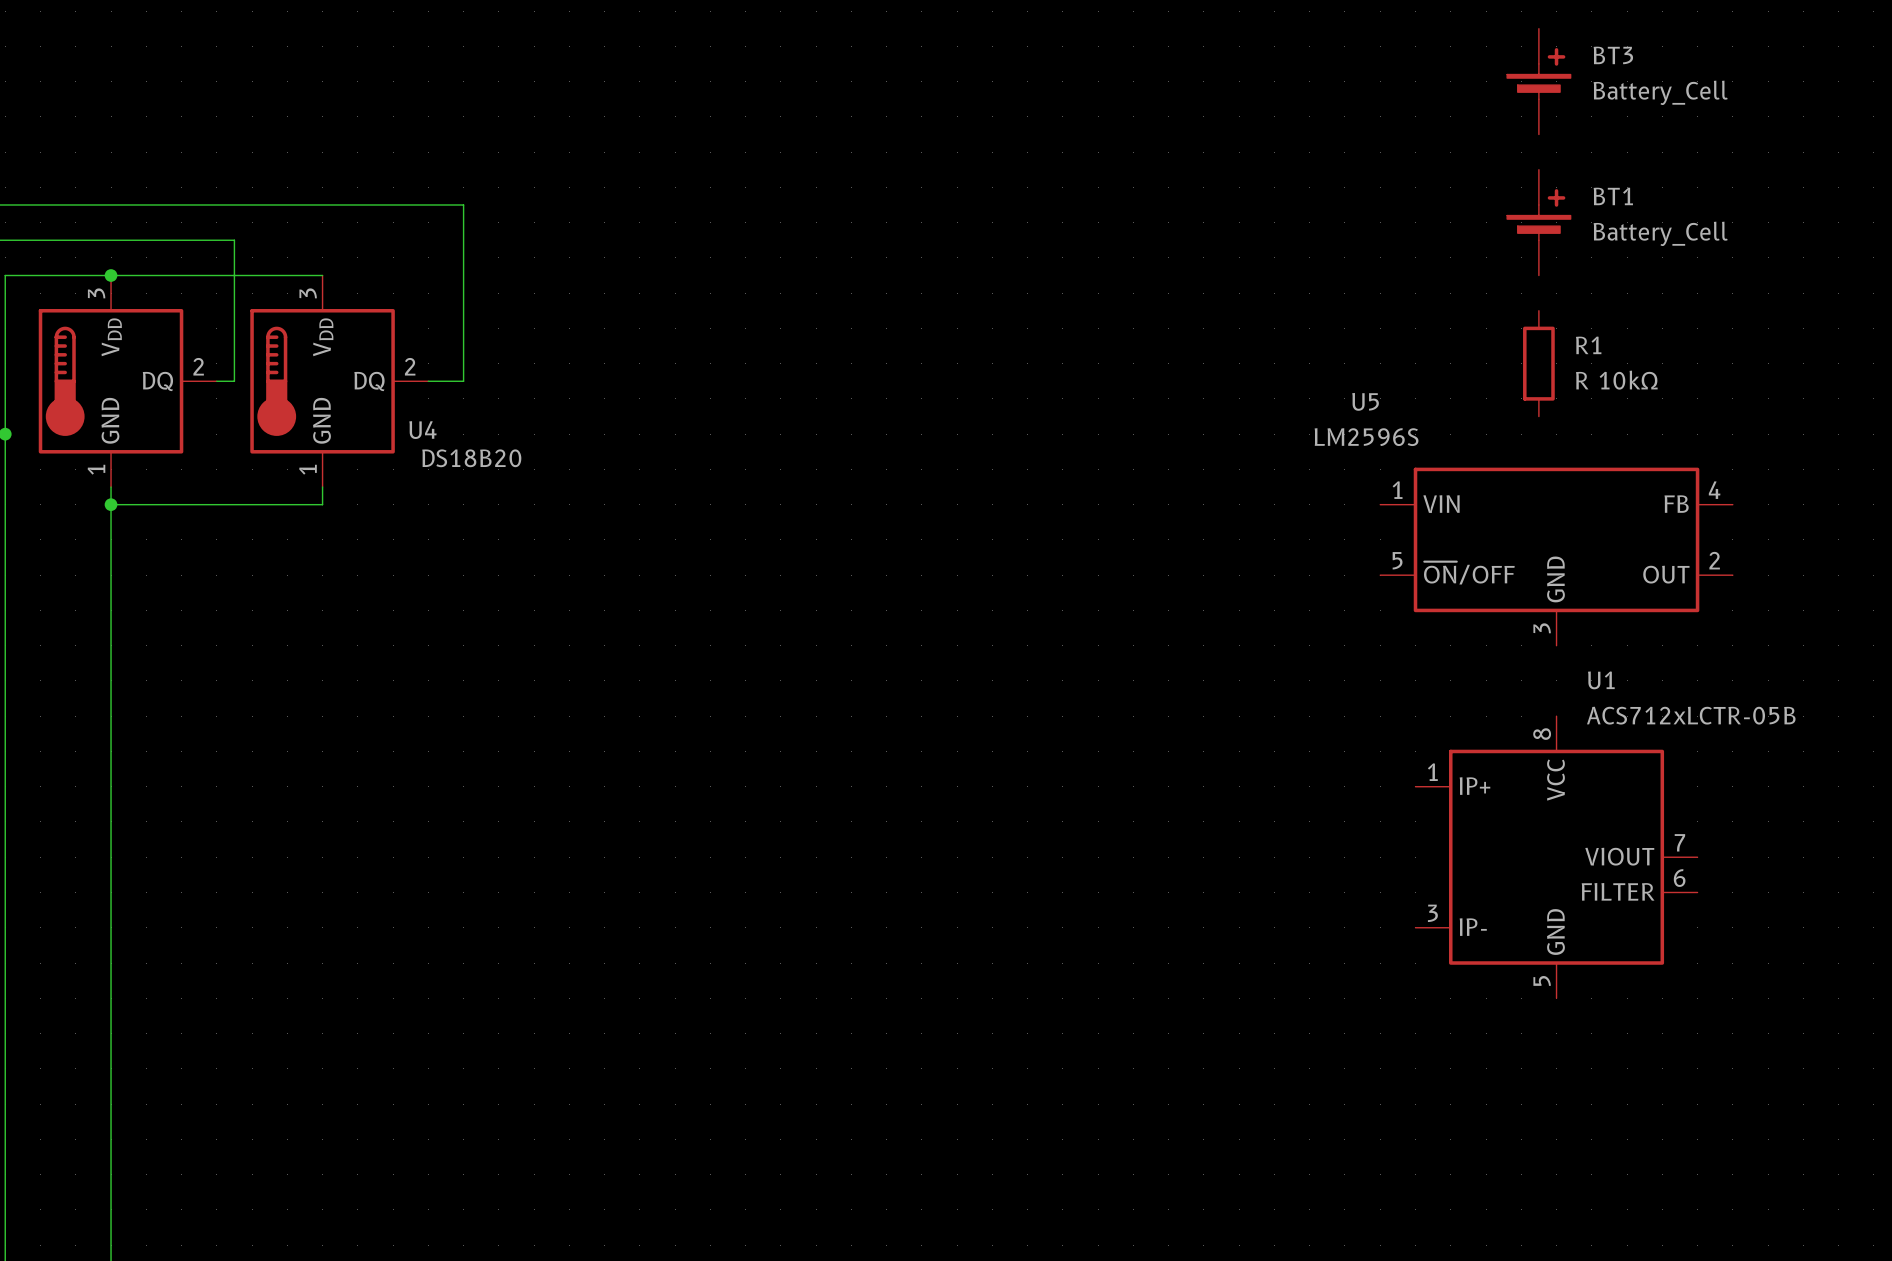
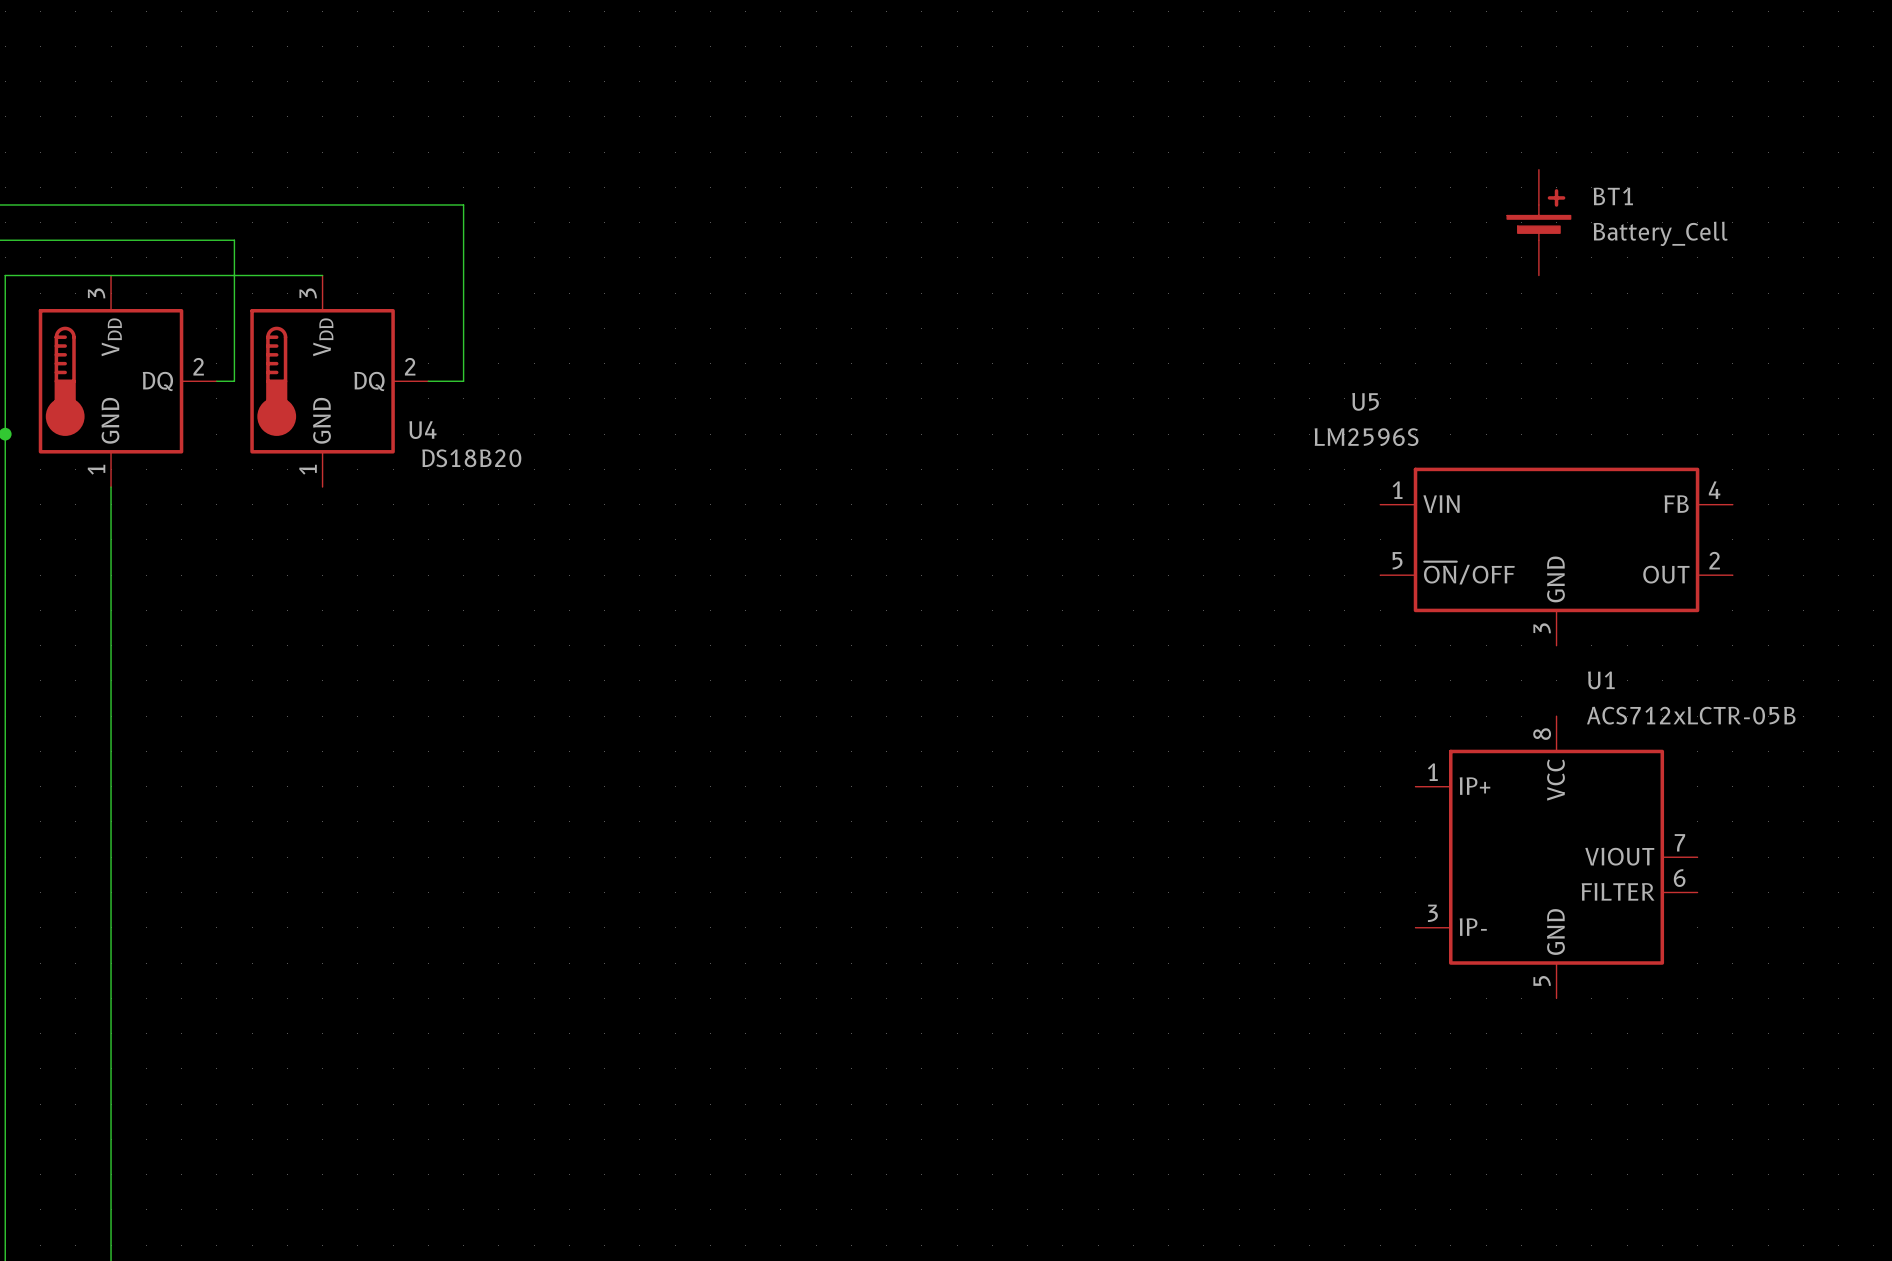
BT3: Battery_Cell (1538, 81) -> none
junction: (111, 275) -> none
R1: R 10kΩ (1538, 363) -> none
wire: (322, 487) (322, 504) (111, 504) -> none
junction: (111, 504) -> none

